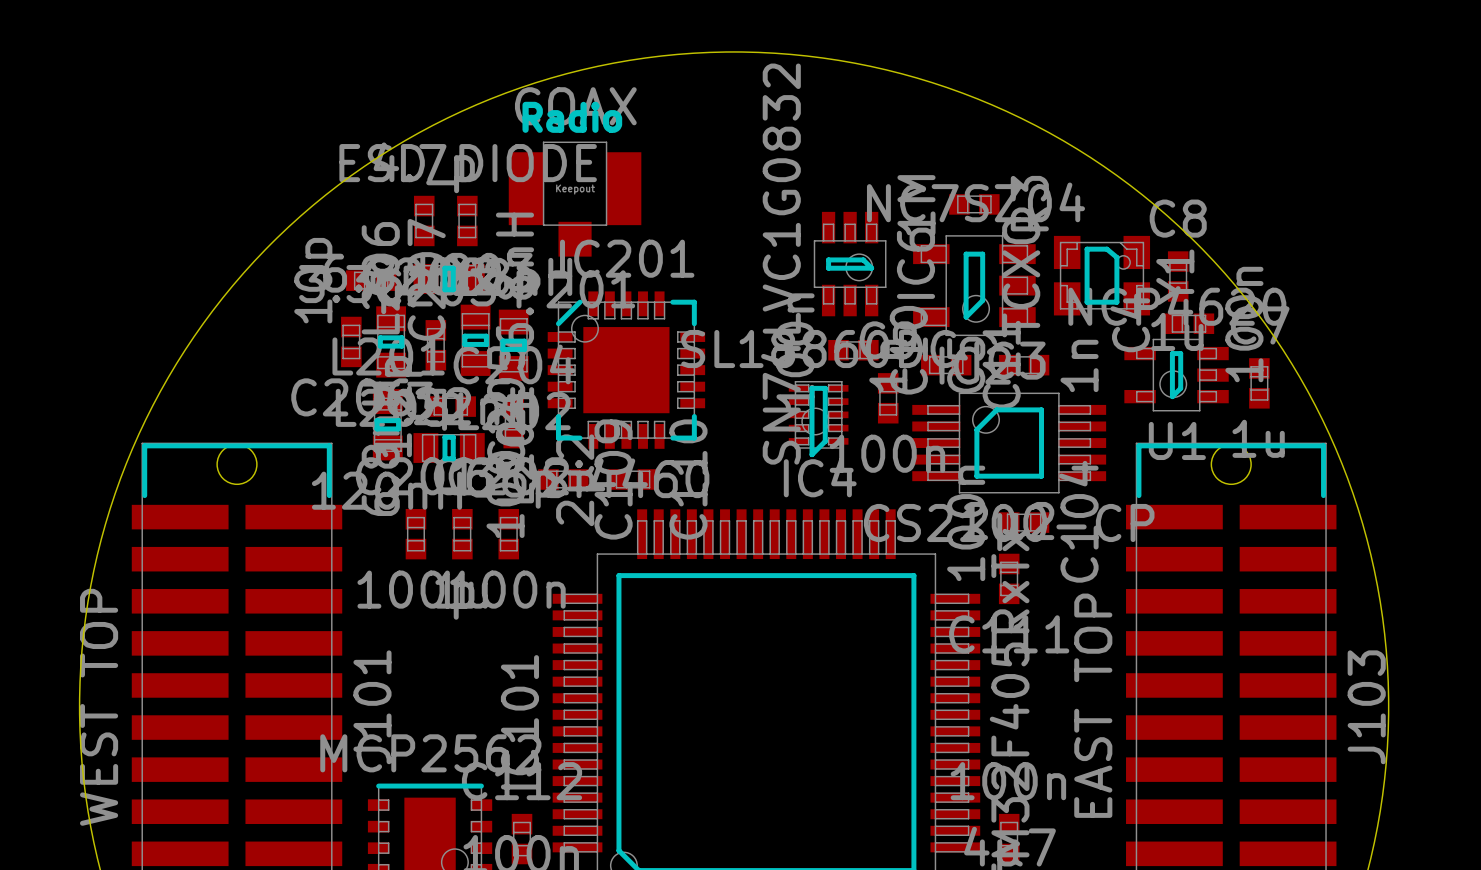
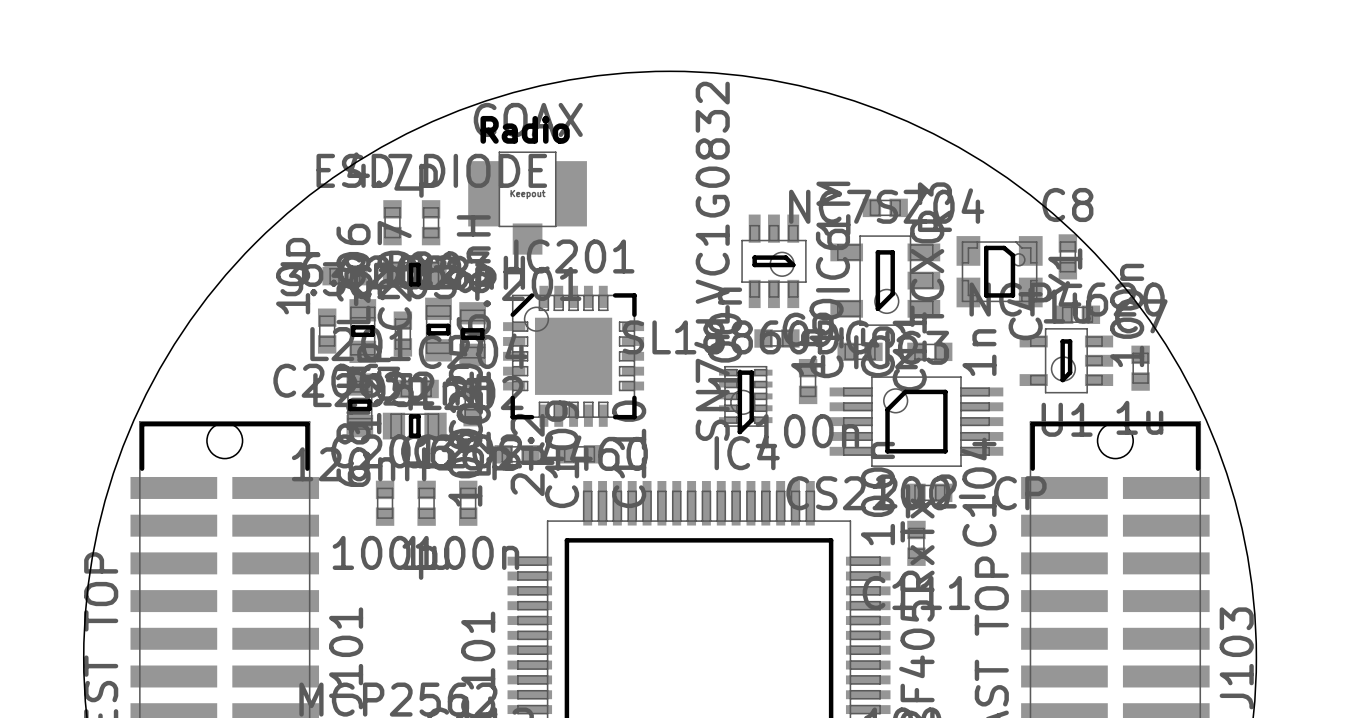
C8 position: (1178, 276) -> (1067, 256)

